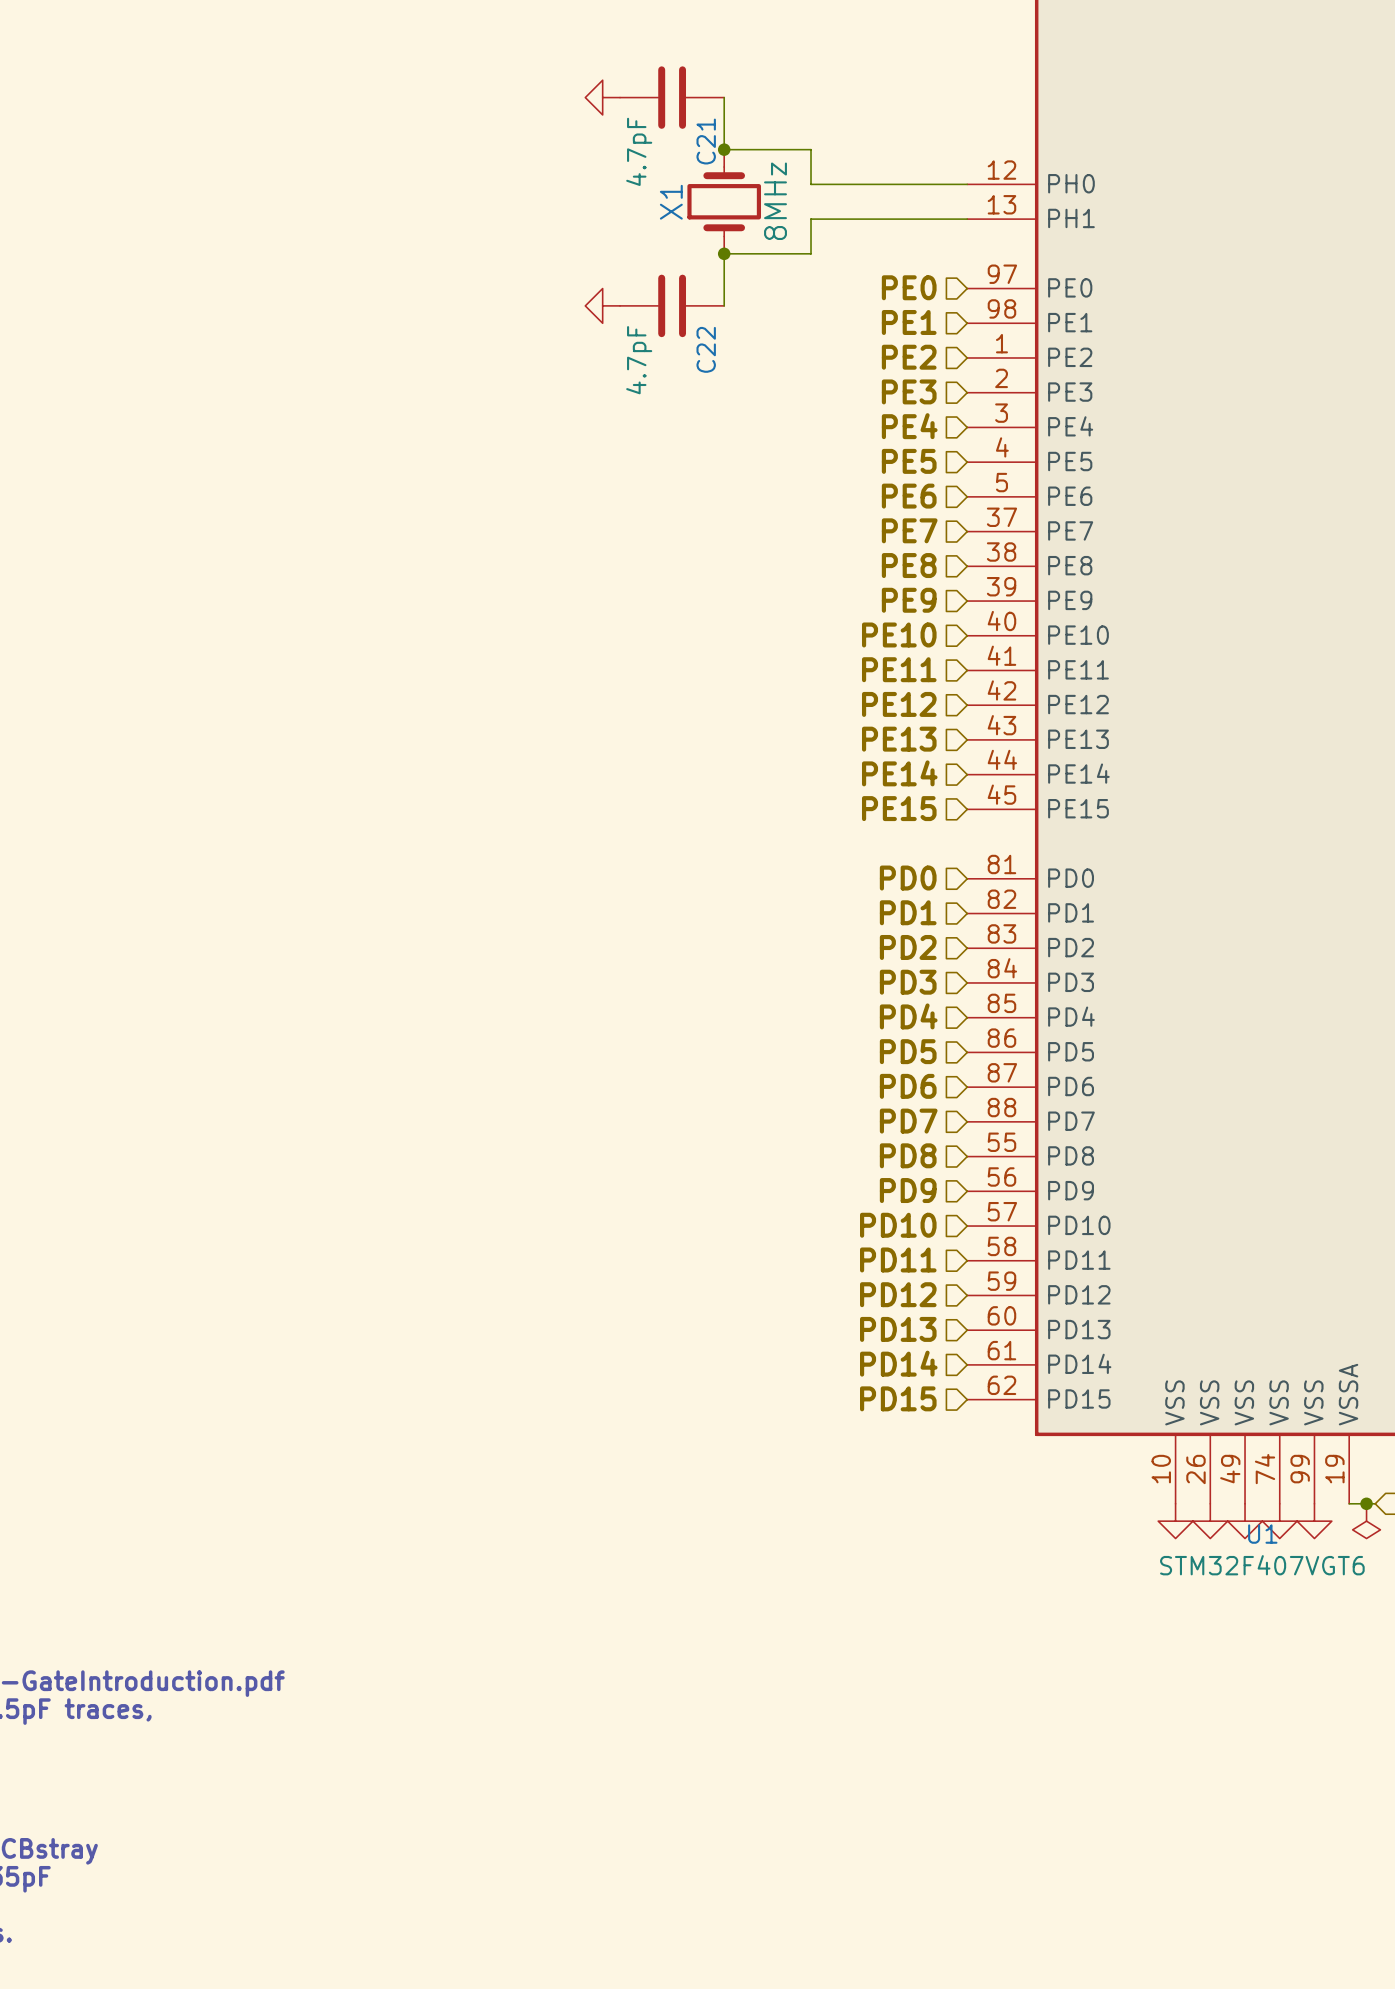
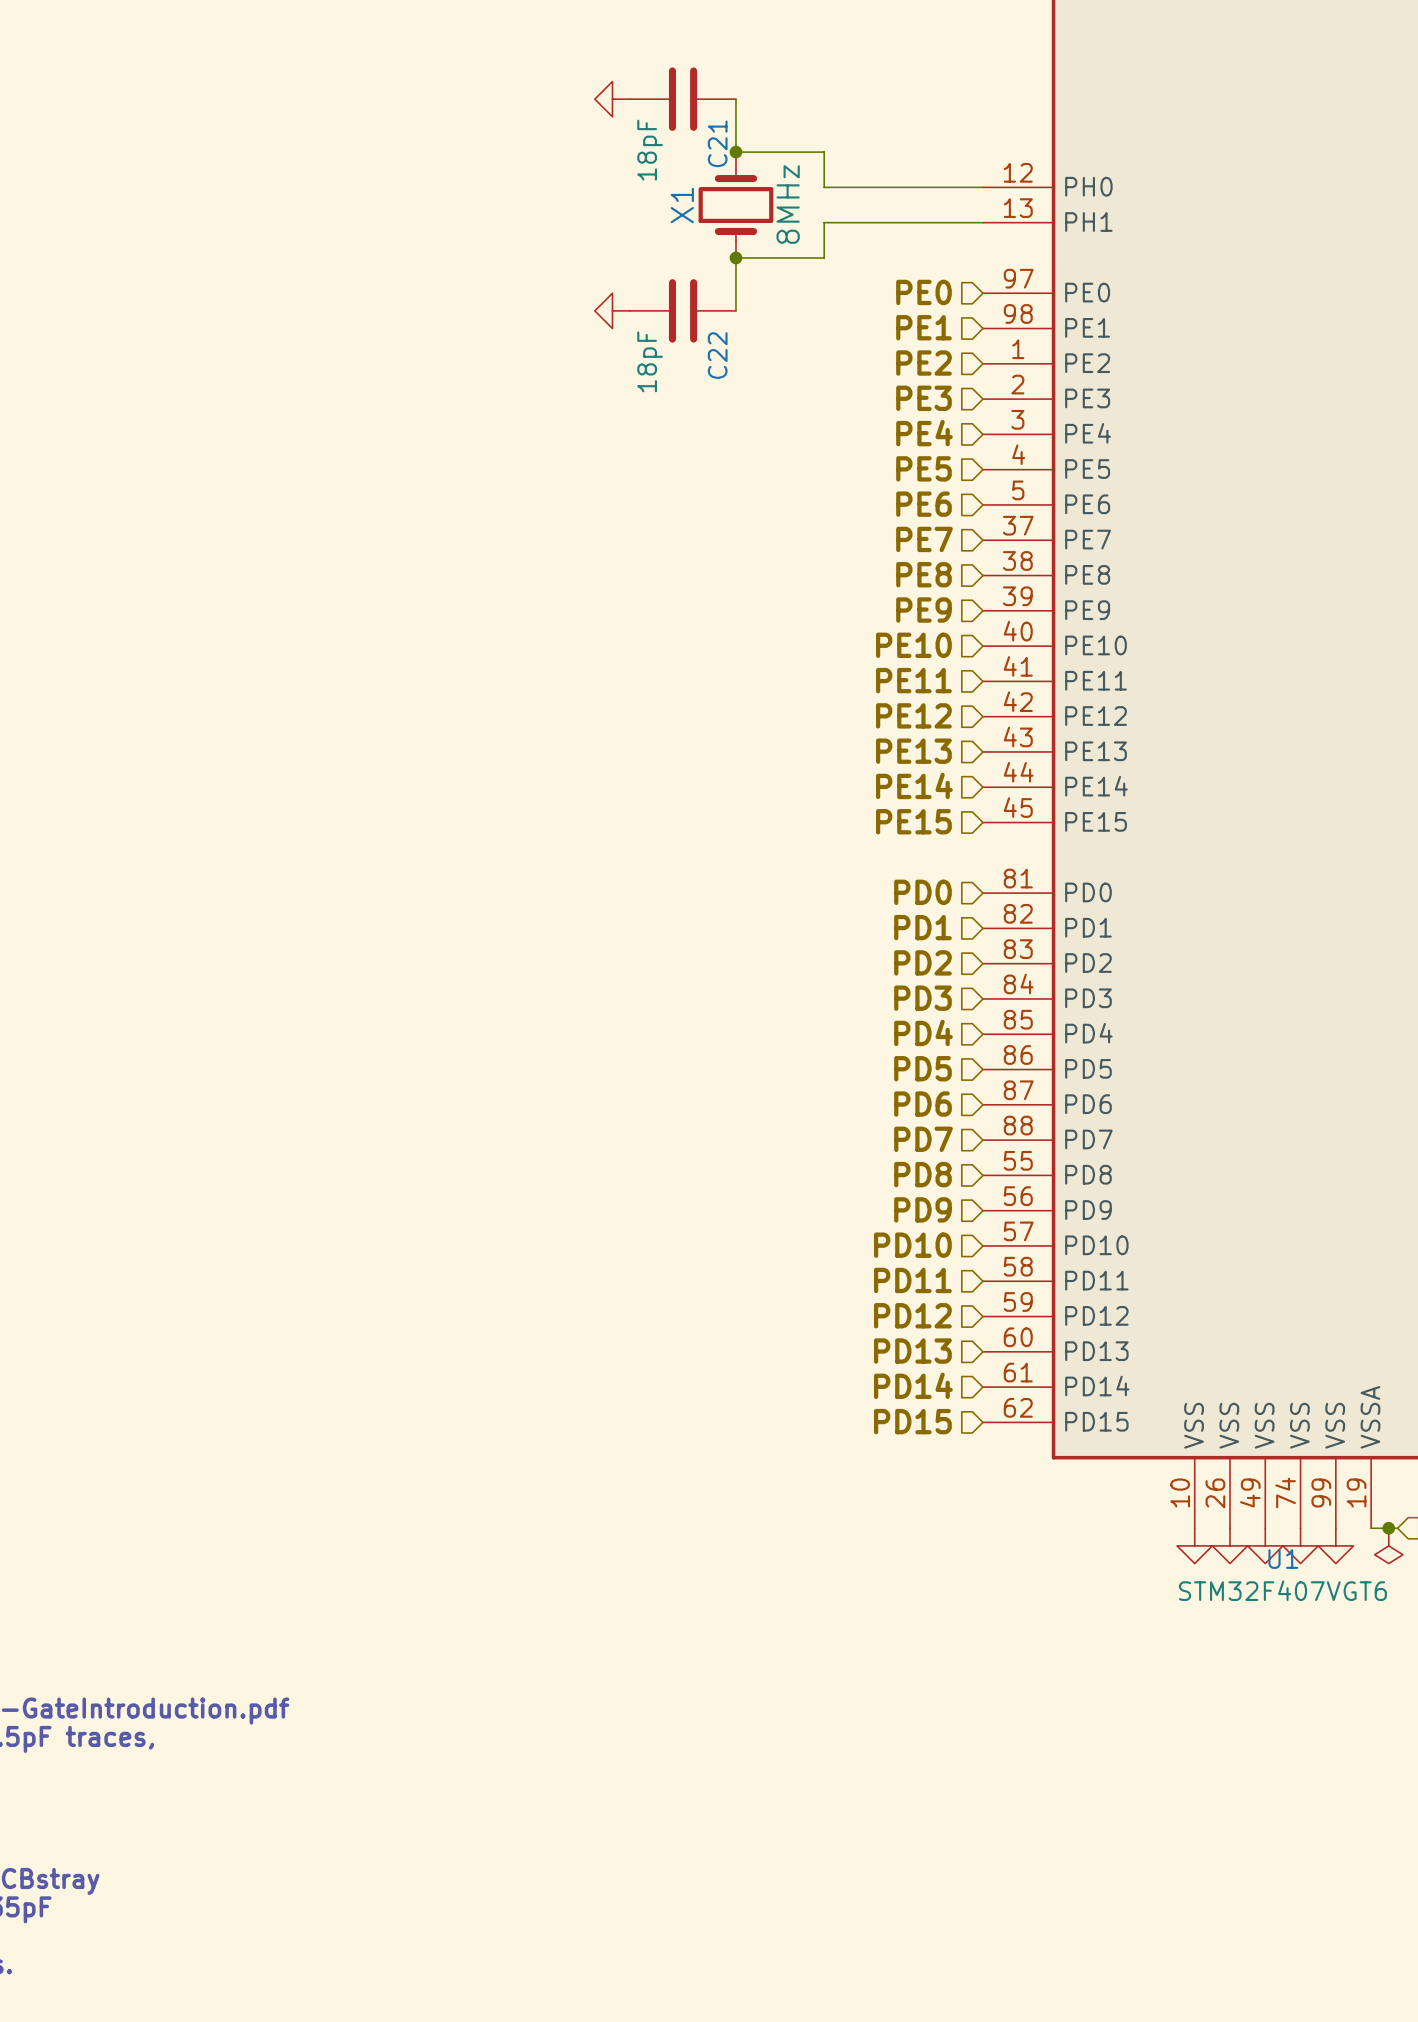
C21 value: 4.7pF (639, 151) -> 18pF (650, 150)
C22 value: 4.7pF (639, 360) -> 18pF (650, 361)

